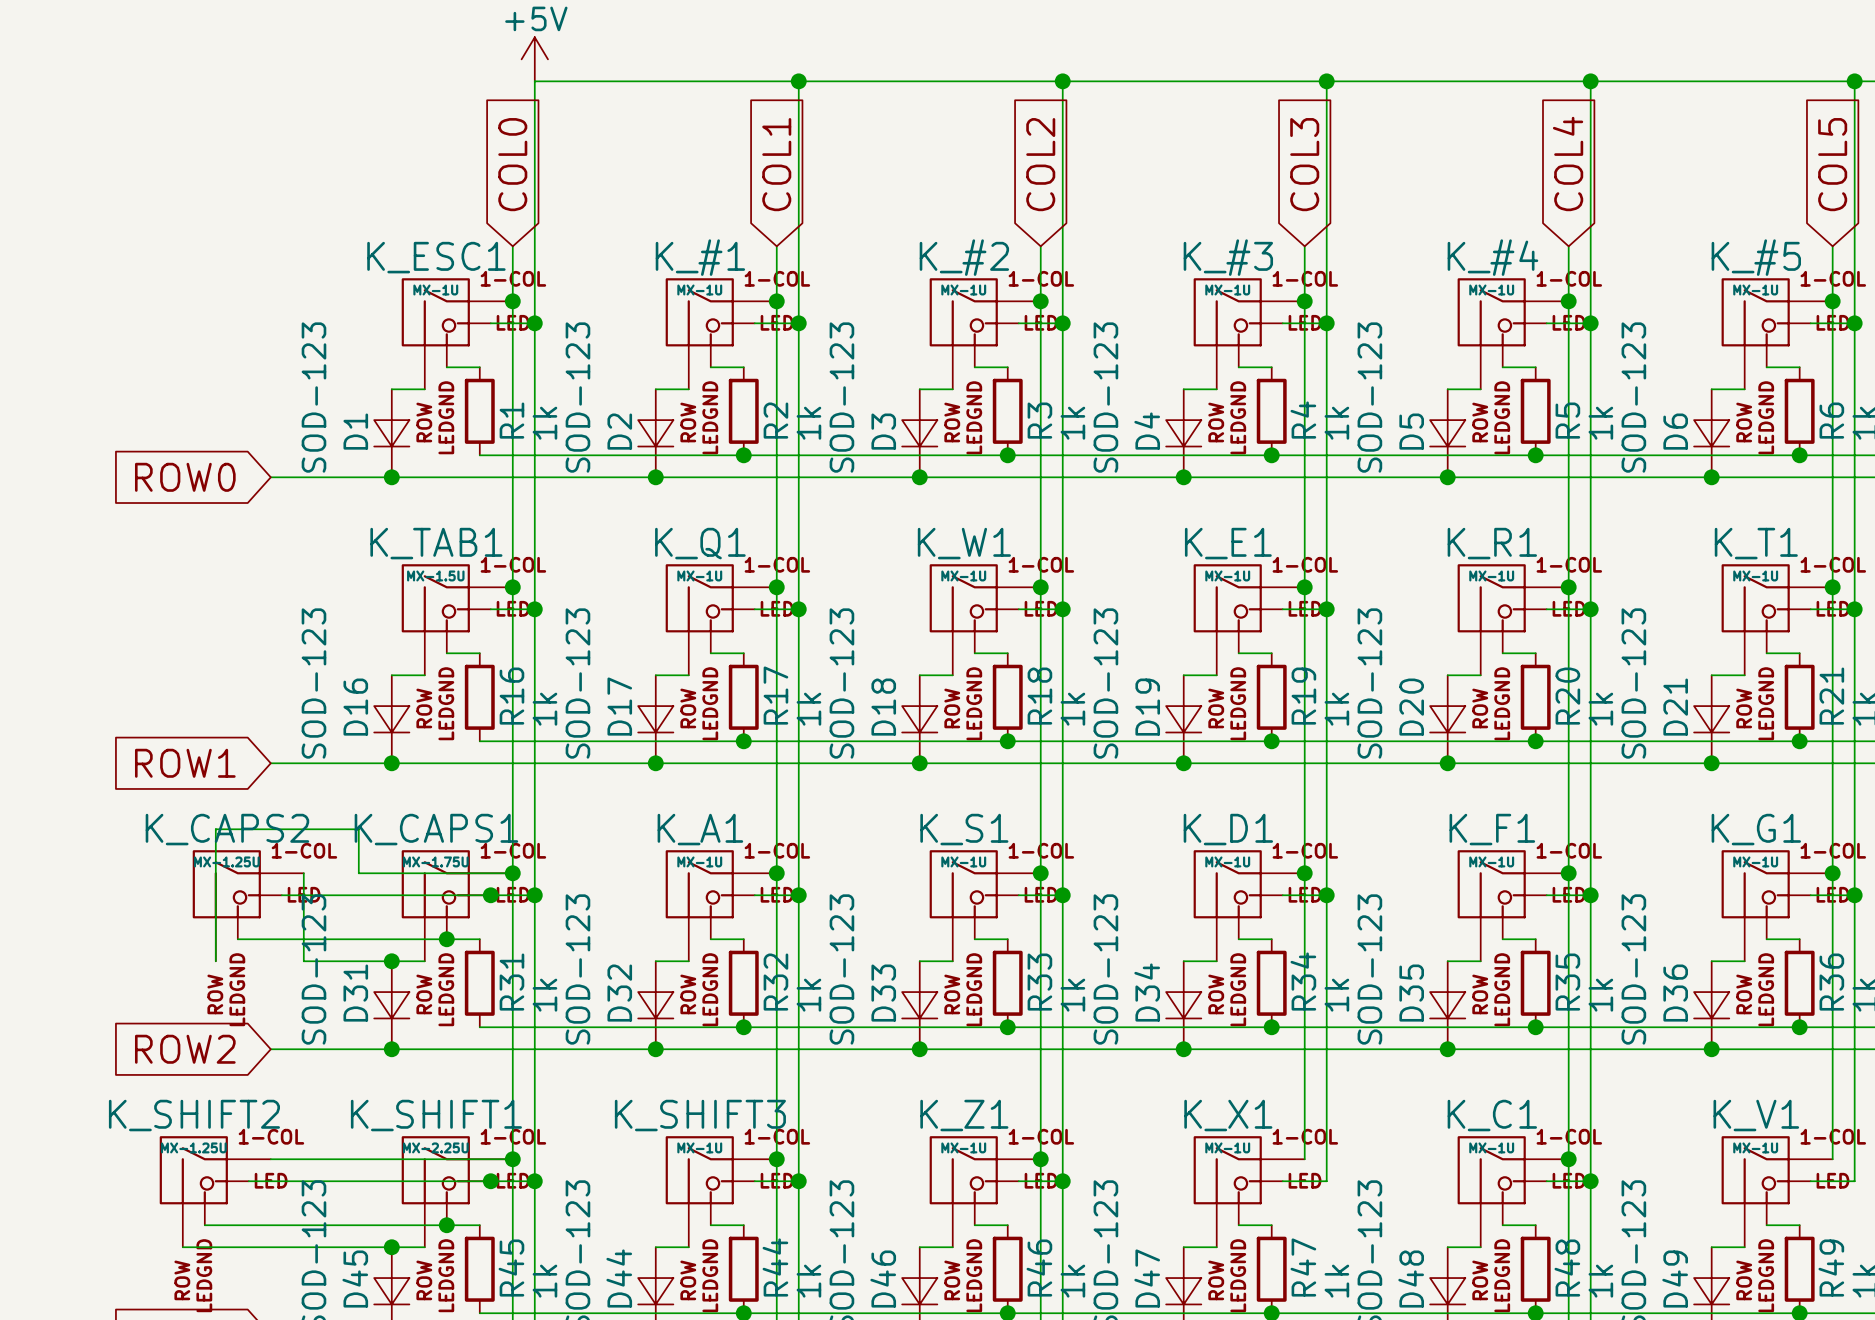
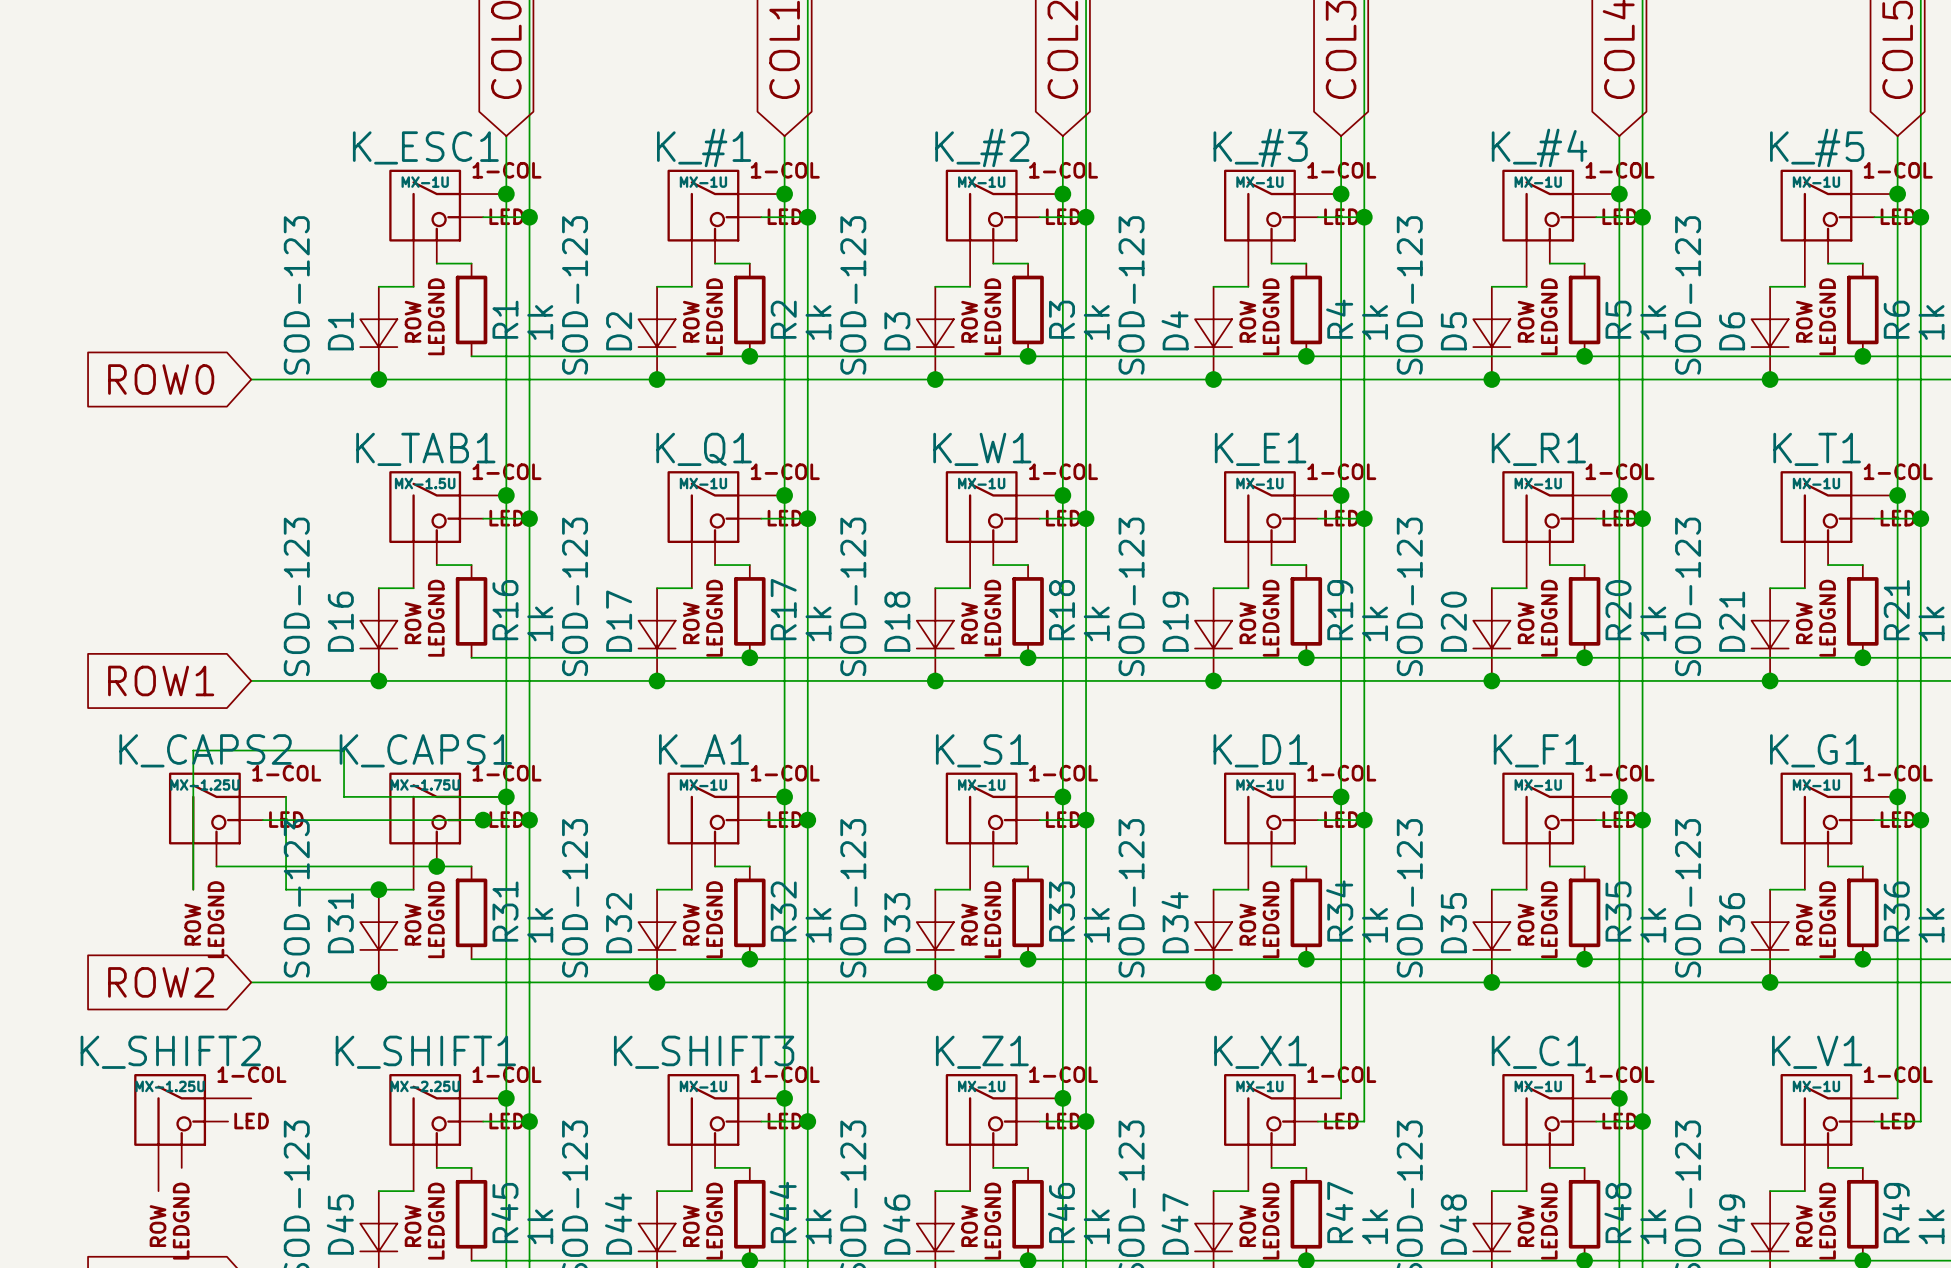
wire: (270, 1159) (512, 1159) -> none
wire: (248, 1181) (490, 1181) -> none
junction: (490, 1181) -> none
wire: (204, 1225) (446, 1225) -> none
junction: (446, 1225) -> none
wire: (182, 1247) (391, 1247) -> none
junction: (391, 1247) -> none

